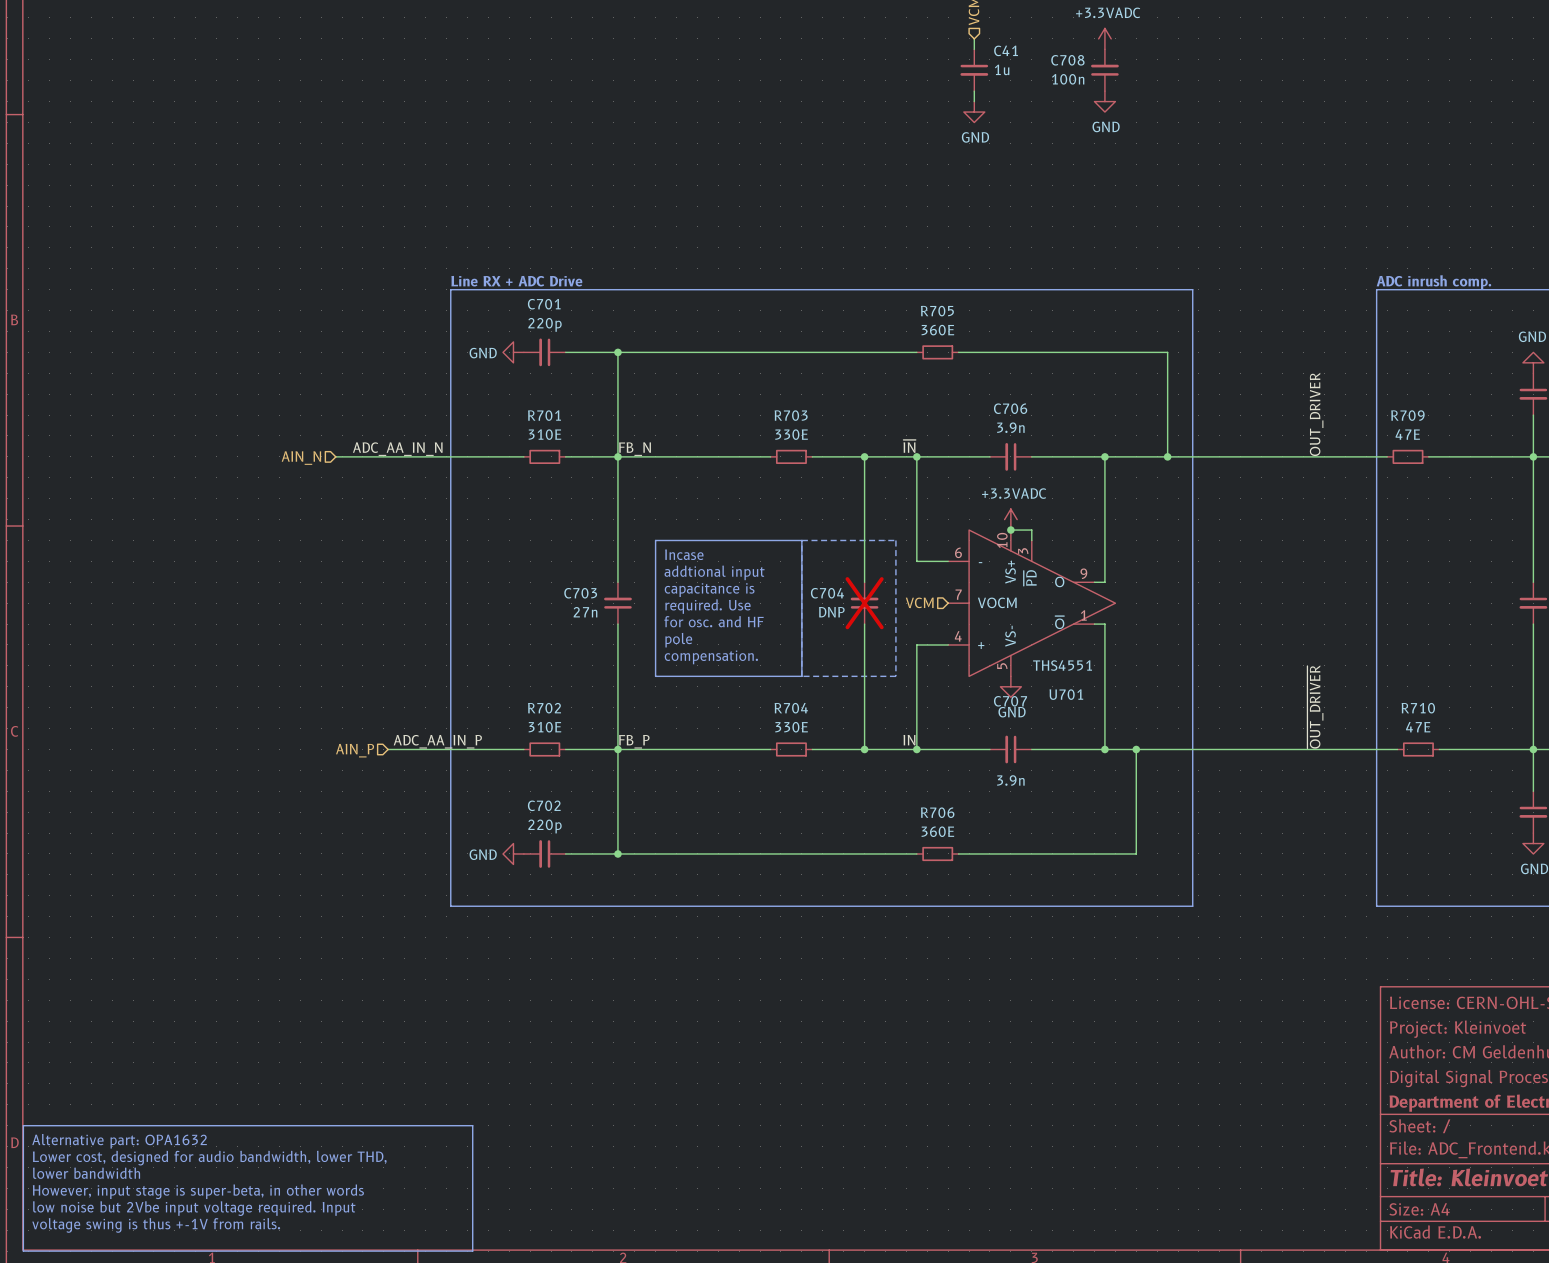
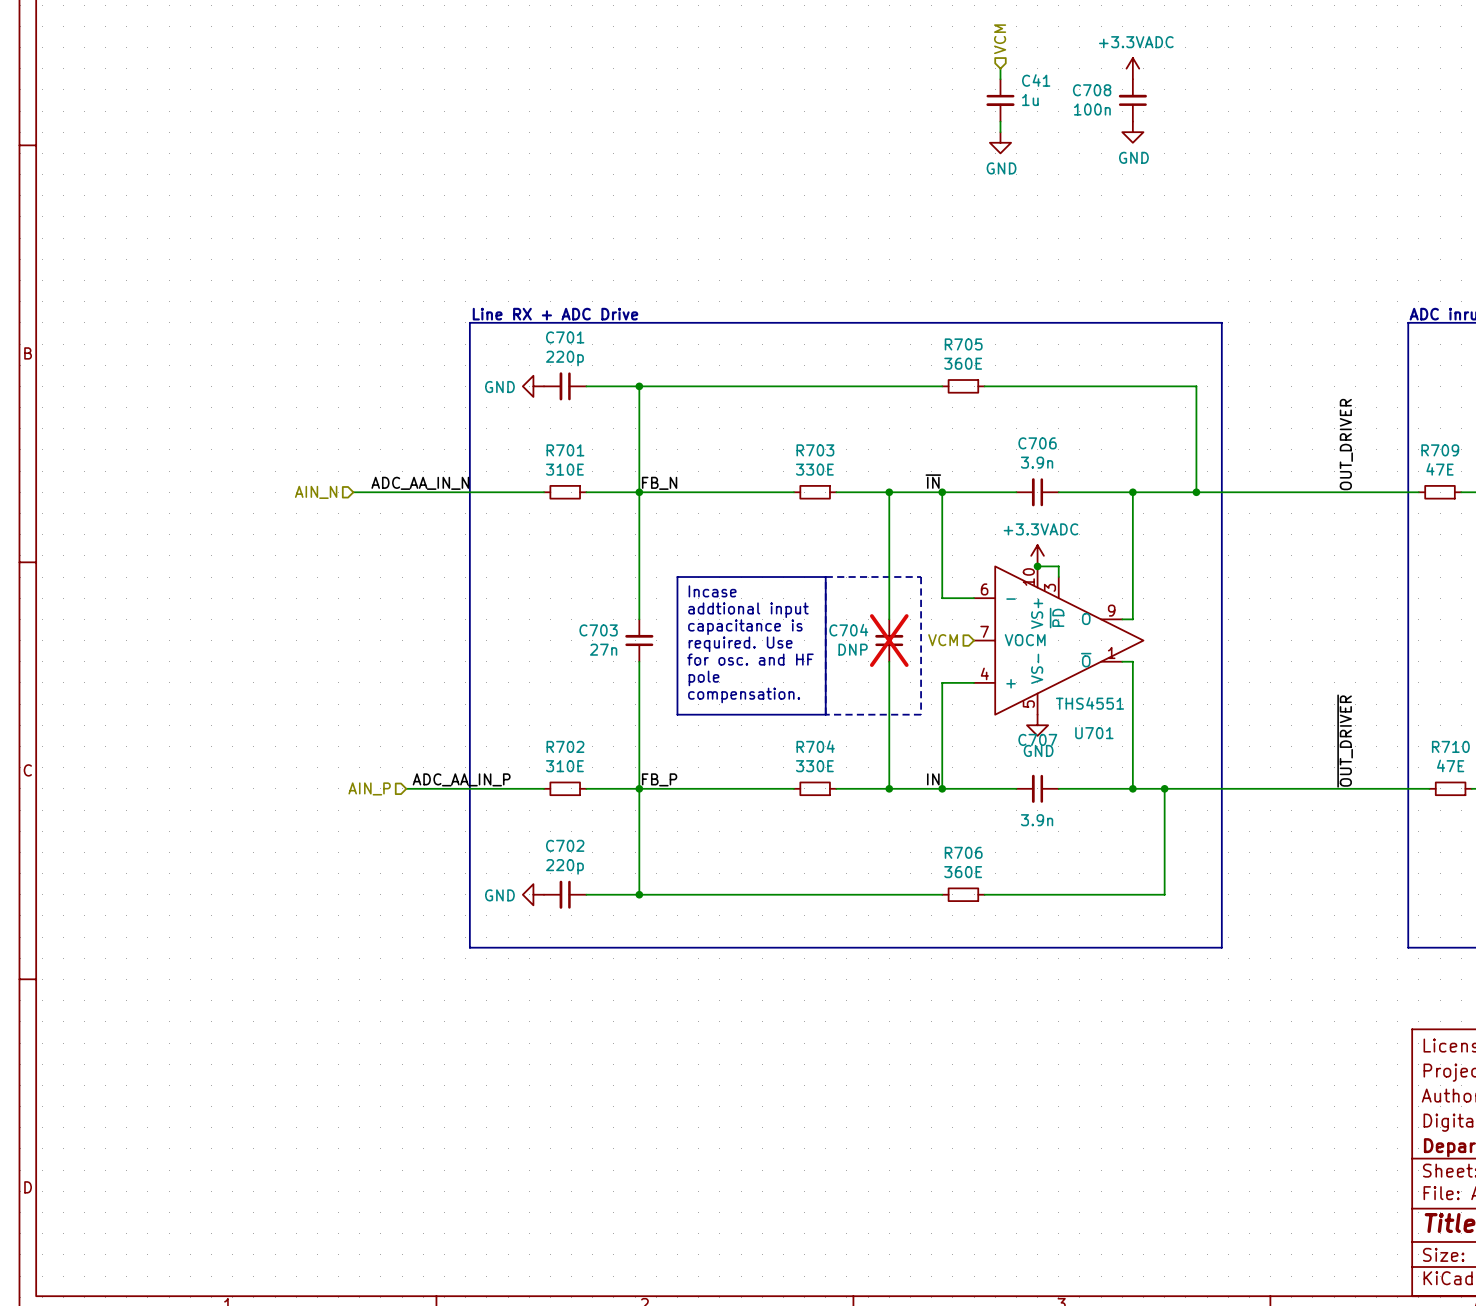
line: (23, 1125) (472, 1125) (472, 1251) (23, 1251) (23, 1125) -> none
text: Alternative part: OPA1632 (119, 1141) -> none
text: Lower cost, designed for audio bandwidth, lower THD, (209, 1158) -> none
text: lower bandwidth (86, 1173) -> none
text: However, input stage is super-beta, in other words (198, 1191) -> none
text: low noise but 2Vbe input voltage required. Input (194, 1208) -> none
text: voltage swing is thus +-1V from rails. (156, 1225) -> none

